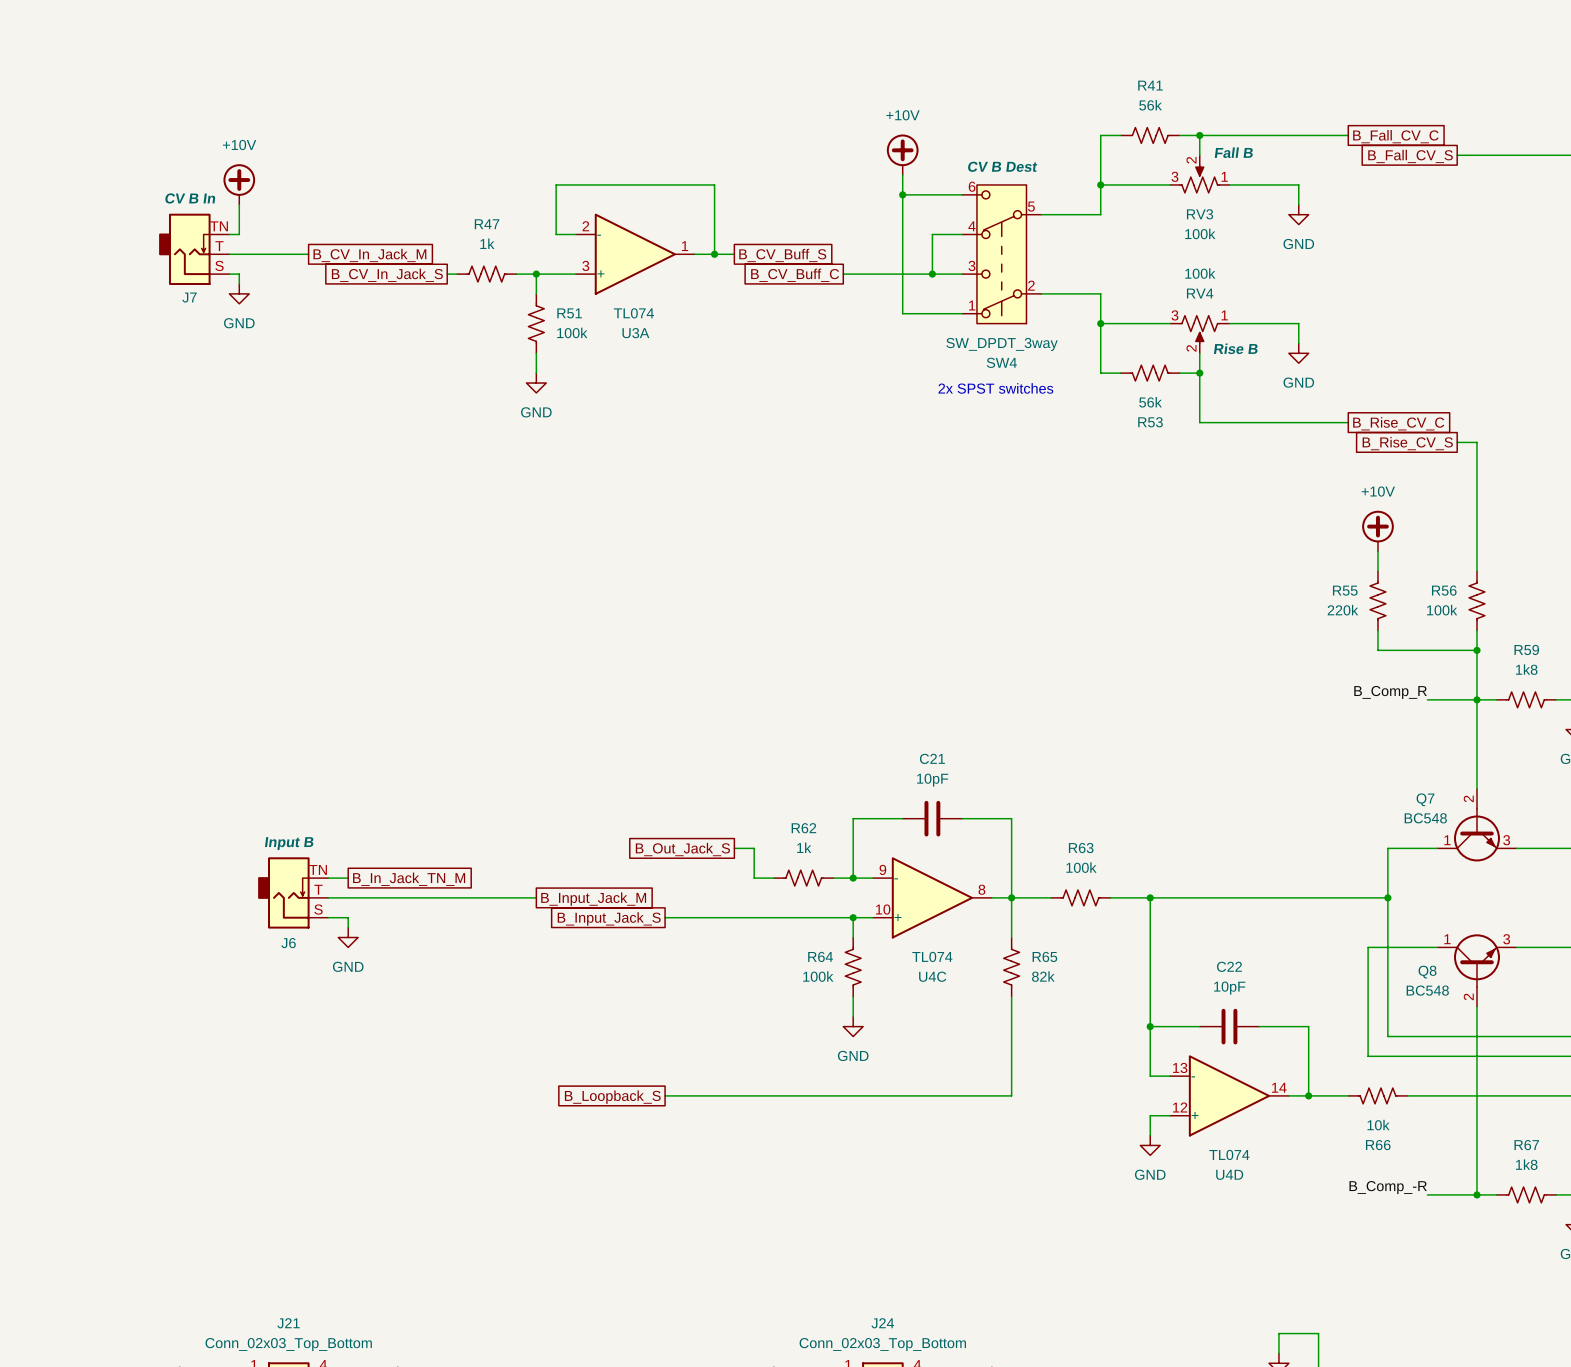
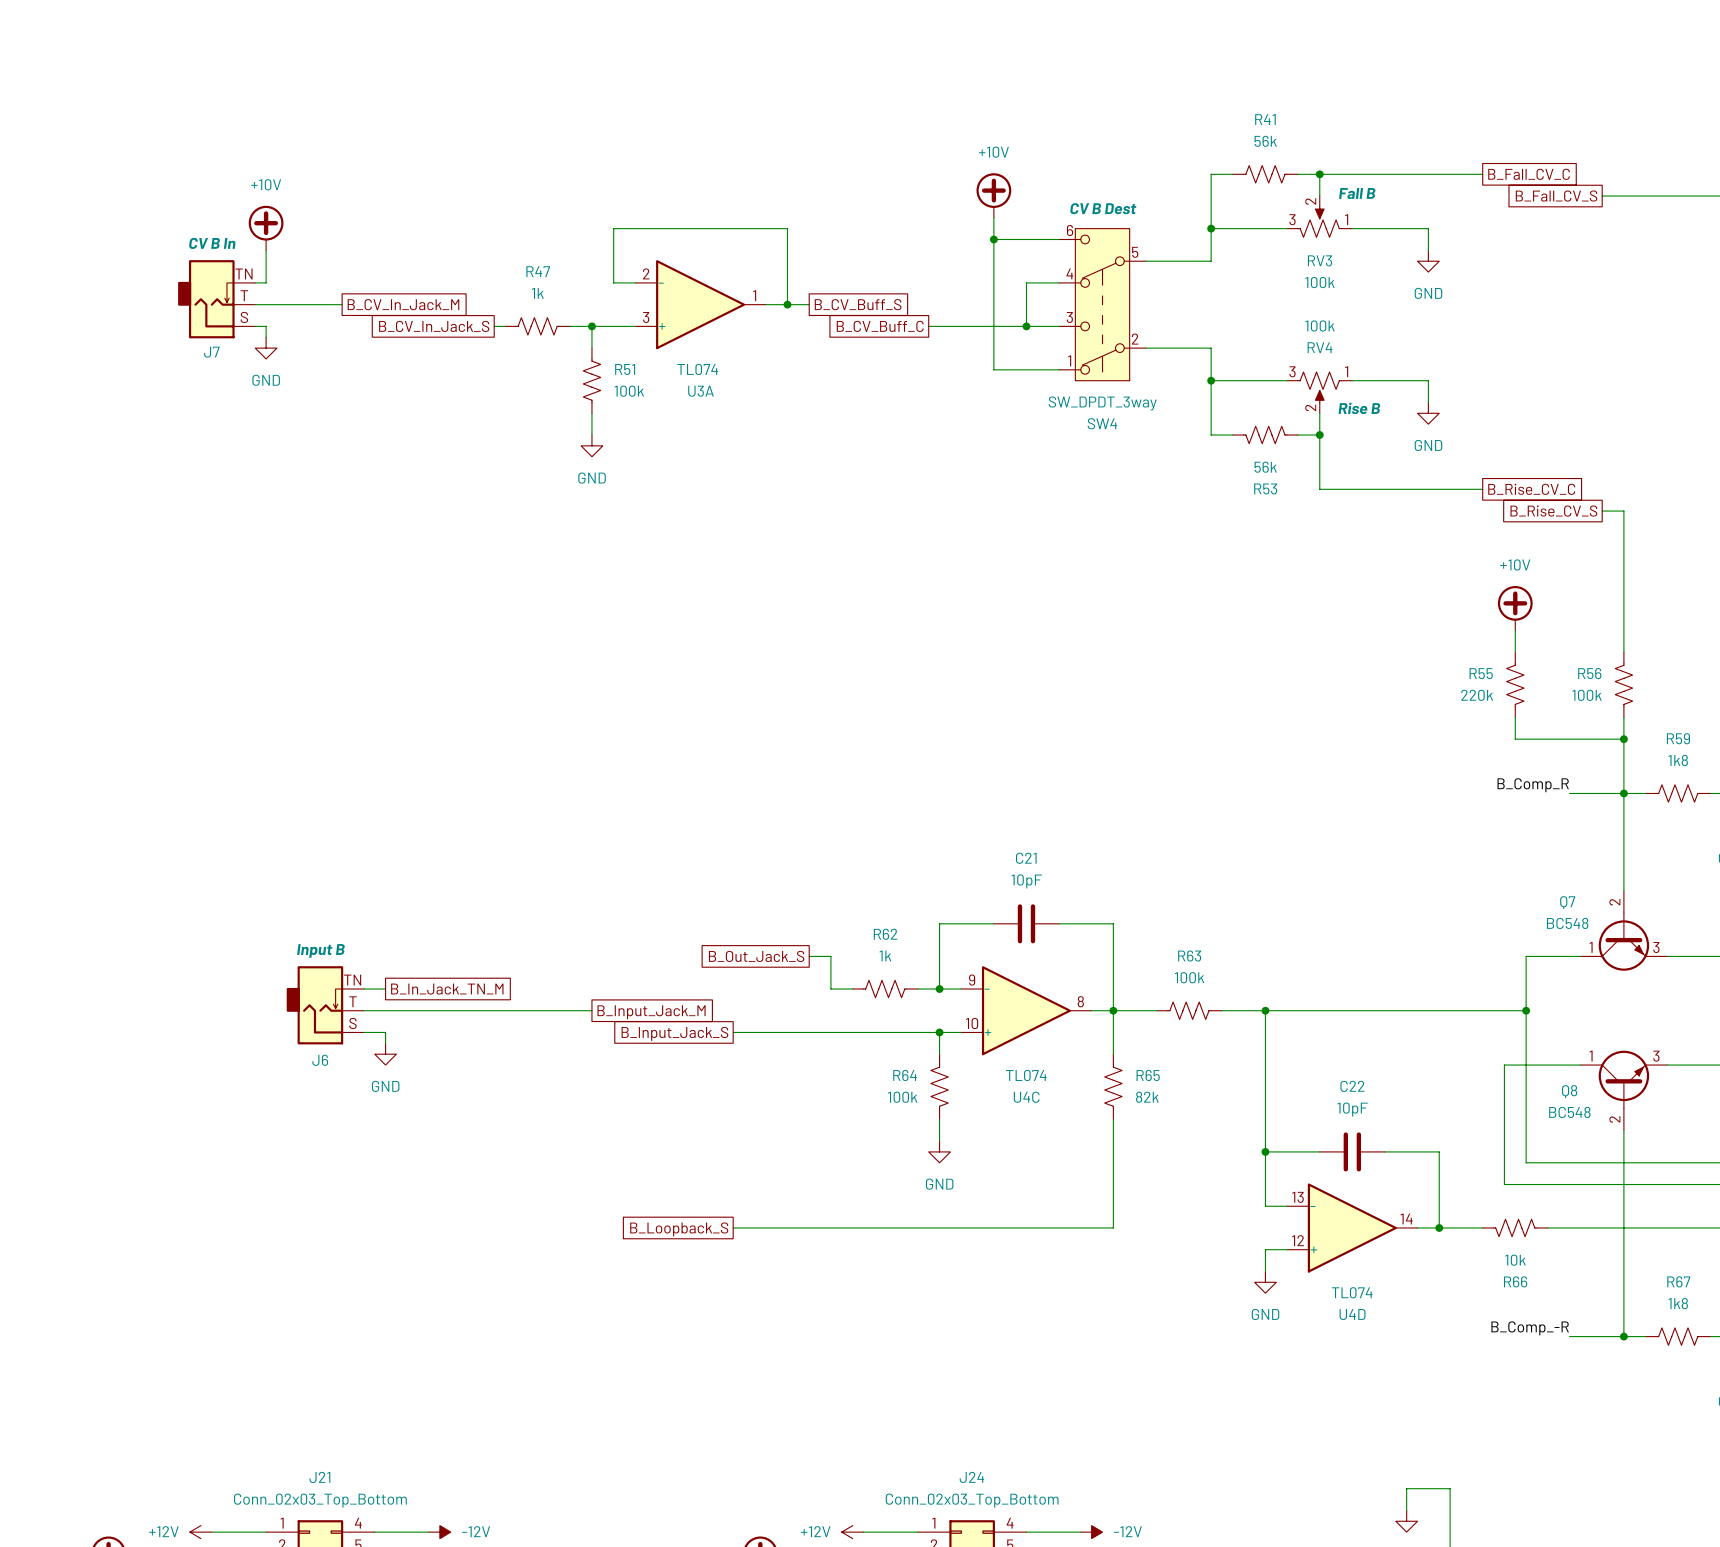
text: 2x SPST switches (995, 388) -> none

